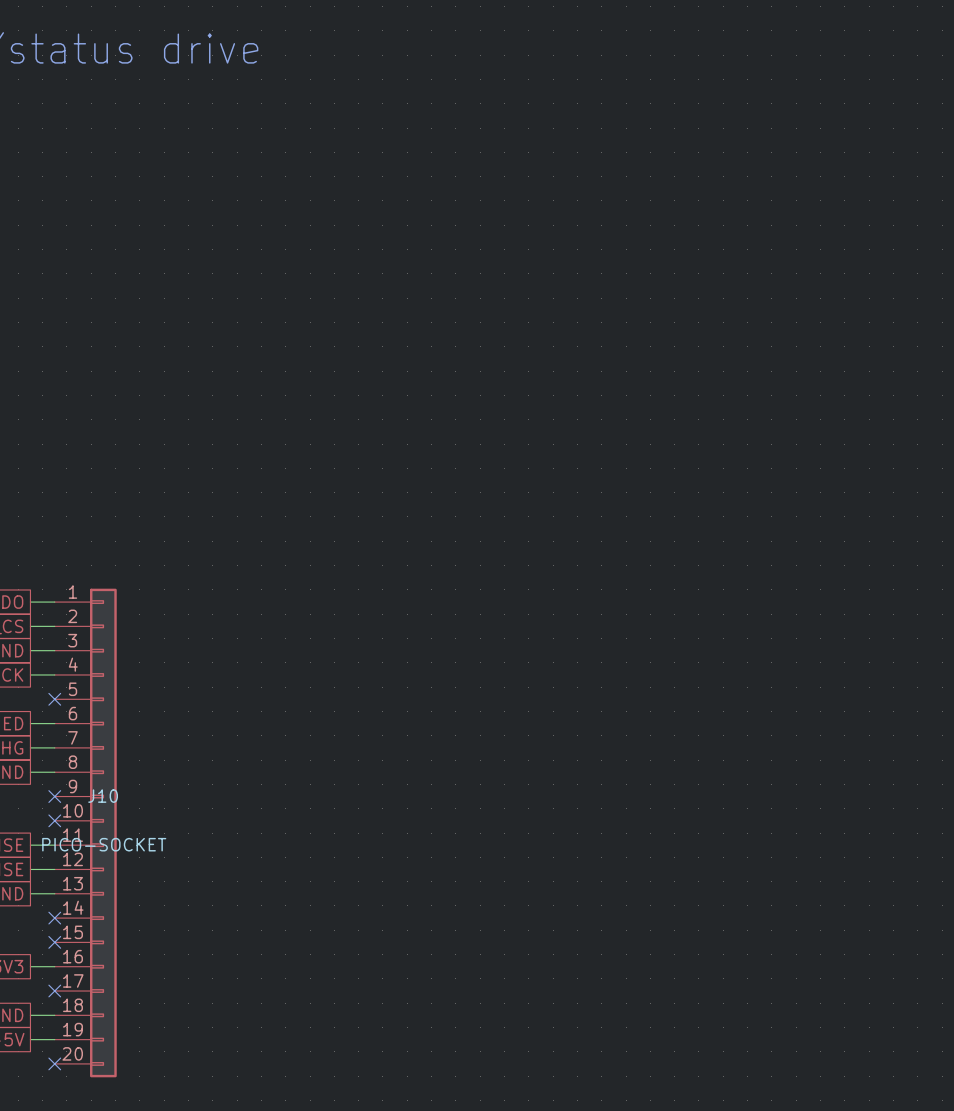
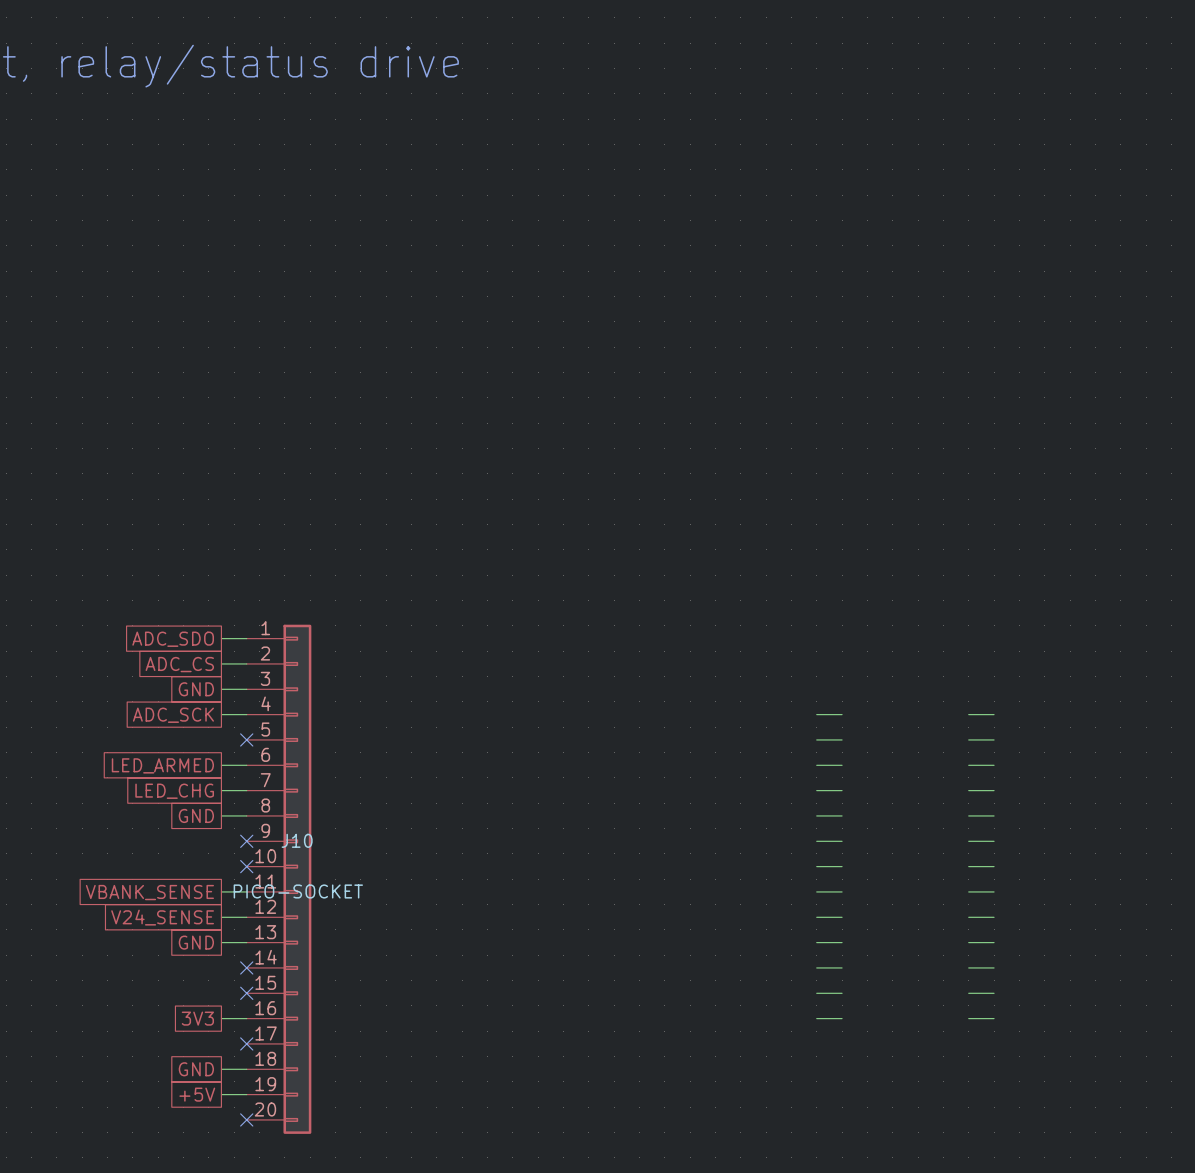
wire: none -> (816, 714) (842, 714)
wire: none -> (968, 714) (994, 714)
wire: none -> (816, 739) (842, 739)
wire: none -> (968, 739) (994, 739)
wire: none -> (816, 765) (842, 765)
wire: none -> (968, 765) (994, 765)
wire: none -> (816, 790) (842, 790)
wire: none -> (968, 790) (994, 790)
wire: none -> (816, 815) (842, 815)
wire: none -> (968, 815) (994, 815)
wire: none -> (816, 841) (842, 841)
wire: none -> (968, 841) (994, 841)
wire: none -> (816, 866) (842, 866)
wire: none -> (968, 866) (994, 866)
wire: none -> (816, 891) (842, 891)
wire: none -> (968, 891) (994, 891)
wire: none -> (816, 917) (842, 917)
wire: none -> (968, 917) (994, 917)
wire: none -> (816, 942) (842, 942)
wire: none -> (968, 942) (994, 942)
wire: none -> (816, 967) (842, 967)
wire: none -> (968, 967) (994, 967)
wire: none -> (816, 993) (842, 993)
wire: none -> (968, 993) (994, 993)
wire: none -> (816, 1018) (842, 1018)
wire: none -> (968, 1018) (994, 1018)

